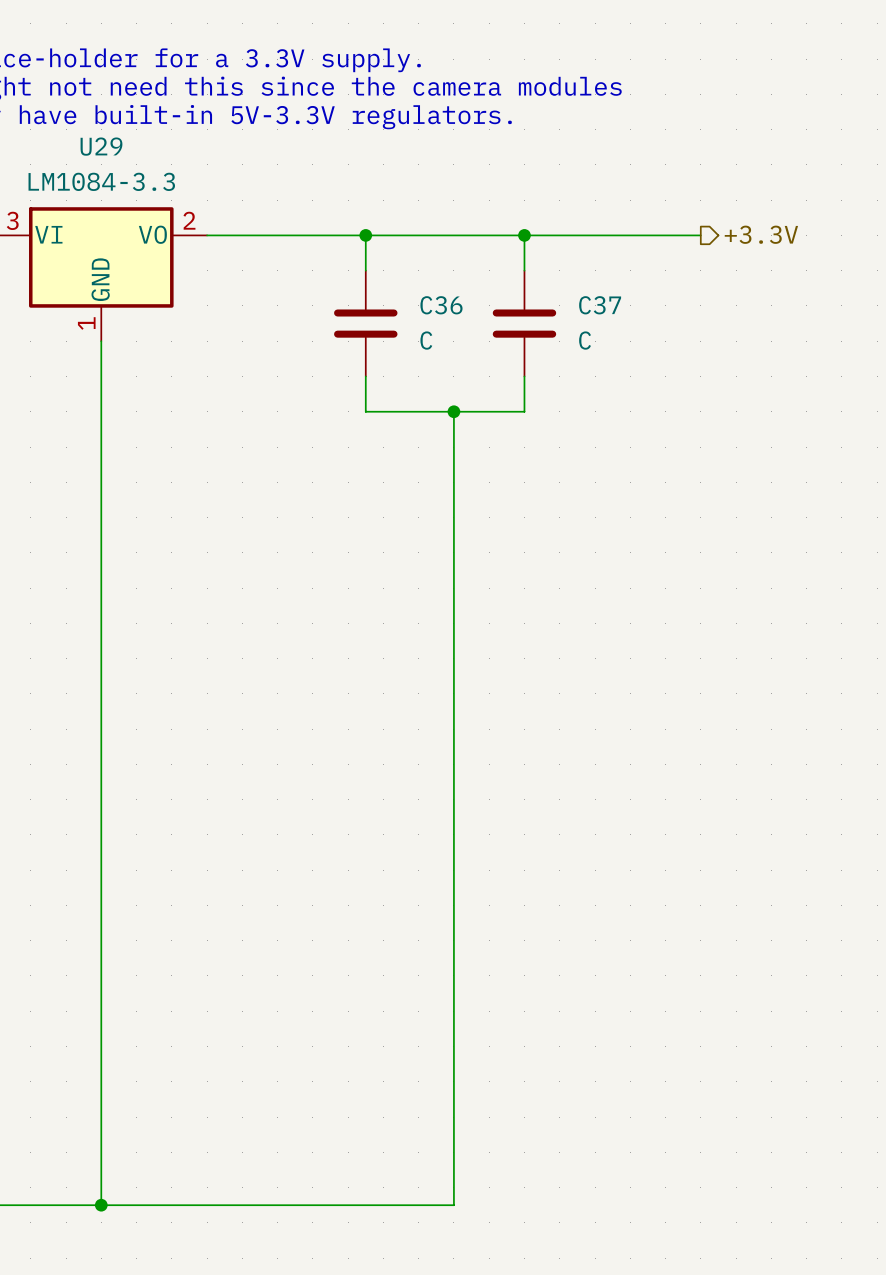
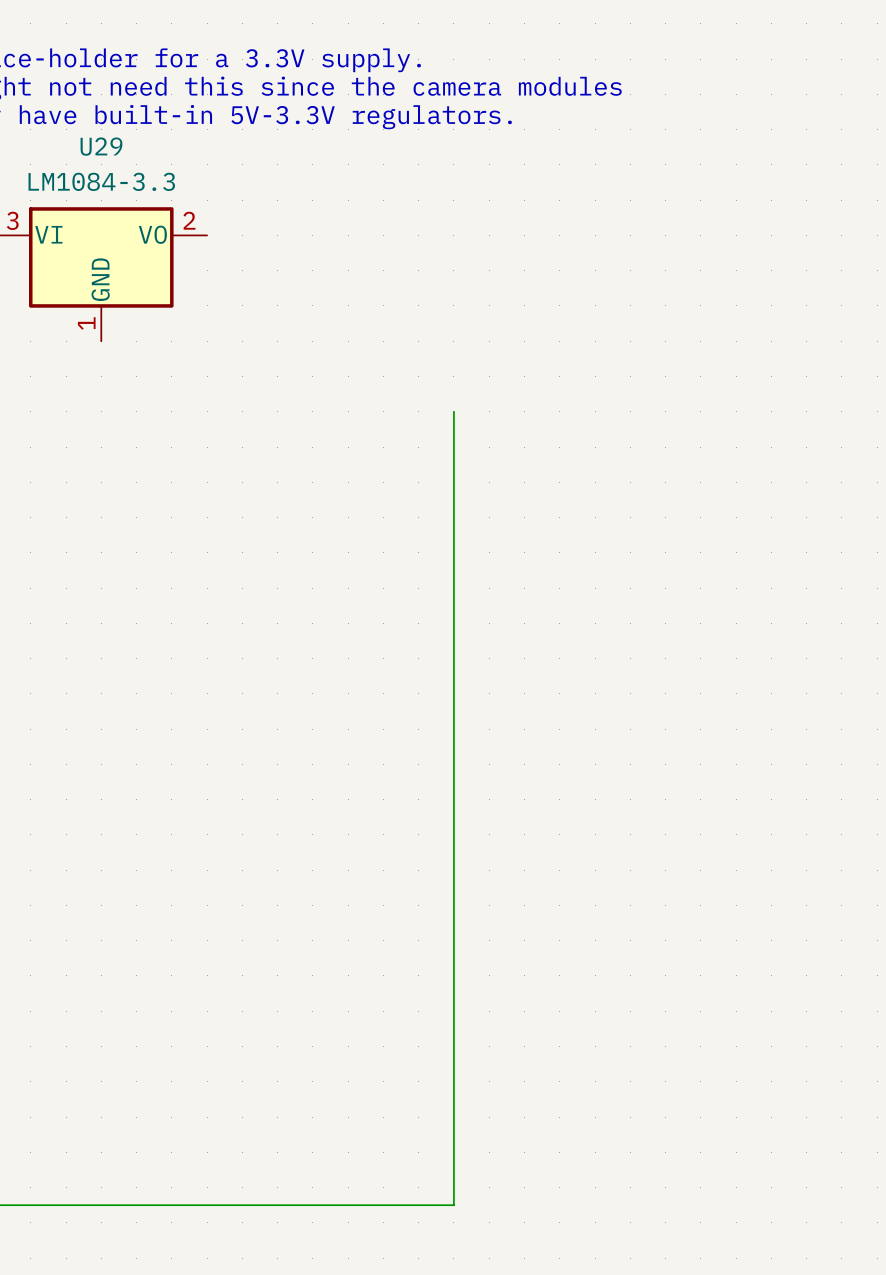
hierarchical label: +3.3V (761, 234) -> none
wire: (207, 235) (700, 235) -> none
wire: (365, 235) (365, 270) -> none
junction: (365, 235) -> none
wire: (524, 235) (524, 270) -> none
junction: (524, 235) -> none
C36: C (365, 323) -> none
C37: C (524, 323) -> none
wire: (101, 341) (101, 1205) -> none
wire: (365, 376) (365, 411) (524, 411) (524, 376) -> none
junction: (453, 411) -> none
junction: (101, 1205) -> none

